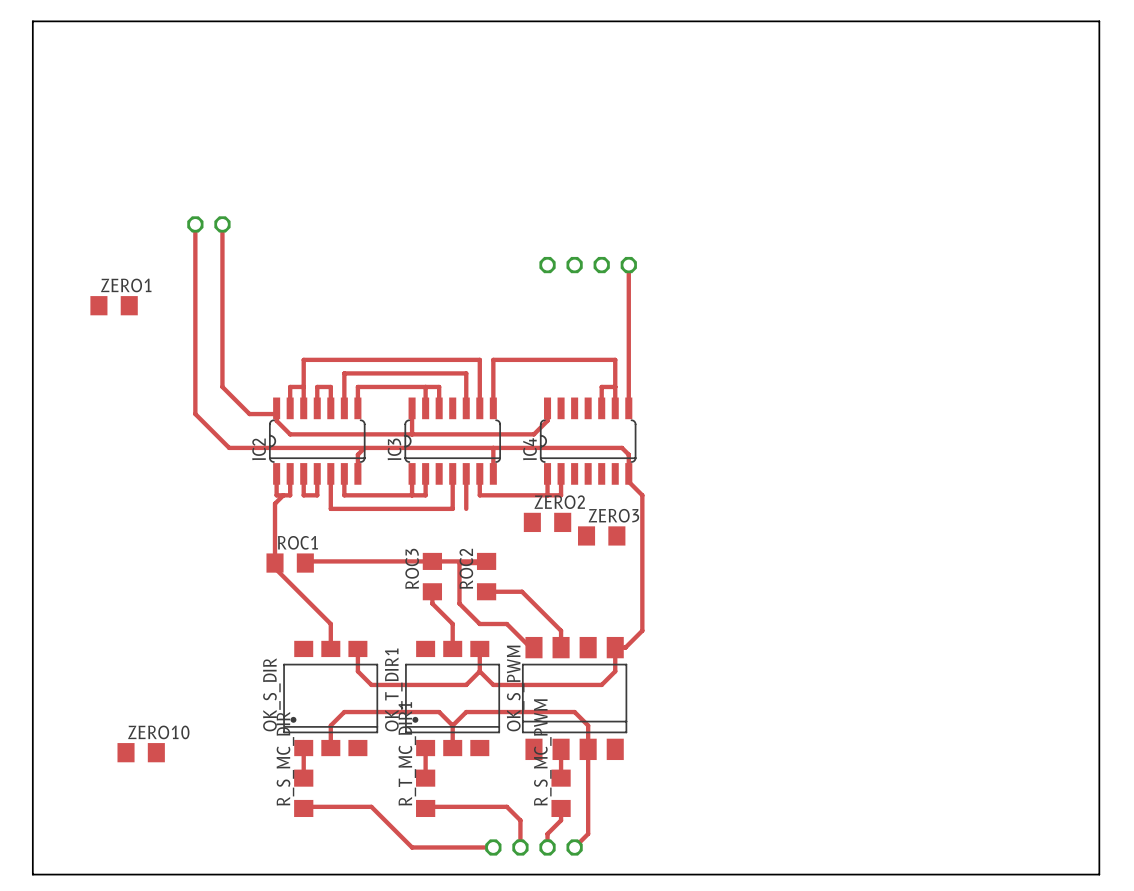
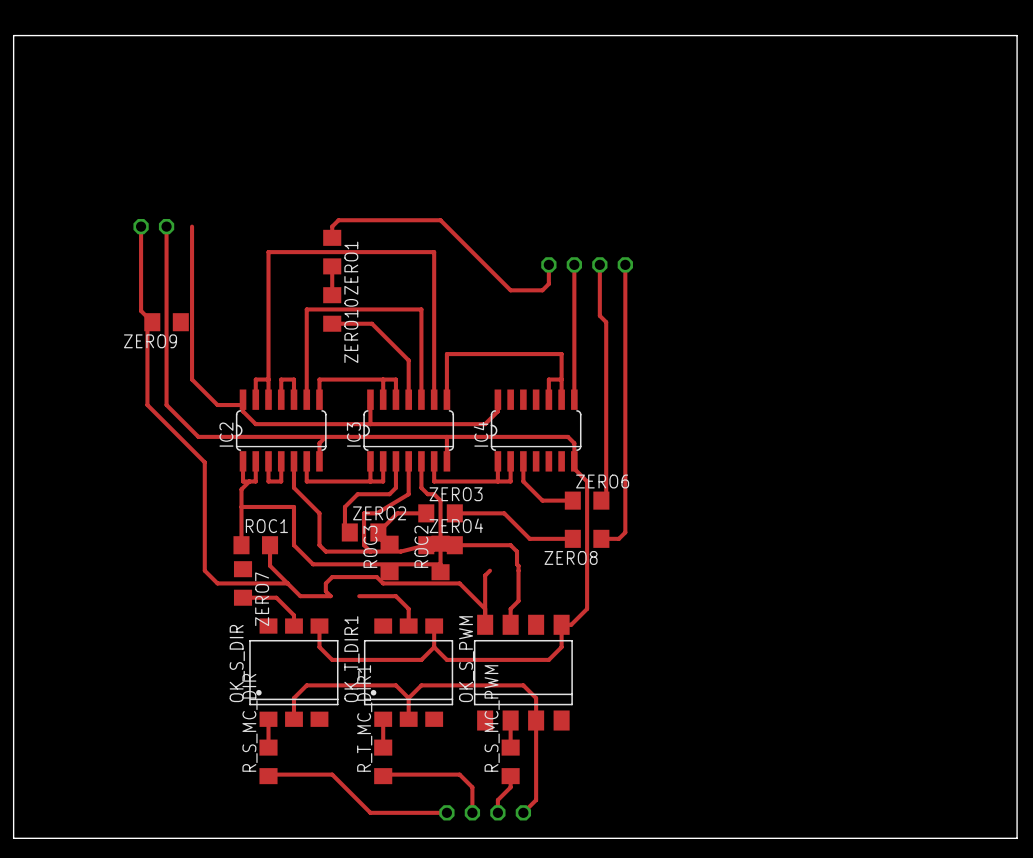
top track: none -> (141, 226) (141, 310) (152, 322) (147, 327) (147, 405) (204, 462) (204, 570) (217, 583) (287, 583)
part position: (222, 224) -> (141, 226)
top track: none -> (332, 237) (332, 226) (338, 220) (440, 220) (510, 290) (542, 290) (548, 283) (548, 264)
part: (547, 265) -> none
part: (574, 265) -> none
top track: none -> (599, 264) (599, 315) (606, 322) (606, 495) (601, 500)
part: none -> (599, 264)
top track: none -> (625, 264) (625, 532) (618, 538) (601, 538)
part: none -> (625, 264)
top track: none -> (332, 266) (332, 295)
ZERO1 rotation: 0° (114, 305) -> 90° clockwise (332, 252)
ZERO1 position: (114, 305) -> (332, 252)
ZERO9: none -> (166, 322)
top track: none -> (332, 323) (371, 323) (408, 360) (408, 399)
top track: (303, 359) (479, 359) -> (268, 354) (268, 252) (434, 252) (434, 354)
top track: (344, 373) (466, 373) -> (306, 366) (306, 309) (421, 309) (421, 366)
top track: none -> (523, 461) (523, 481) (542, 500) (572, 500)
top track: (330, 502) (330, 508) (398, 508) -> (349, 532) (344, 527) (344, 506) (357, 494)
top track: none -> (293, 487) (319, 513) (319, 545) (325, 551) (400, 551) (426, 545)
top track: (466, 502) (466, 508) -> (421, 487) (427, 494) (434, 494) (440, 500) (440, 564) (313, 564) (293, 545) (293, 506) (241, 506)
top track: (432, 508) (452, 508) -> (389, 494) (395, 487) (395, 461)
top track: none -> (408, 494) (376, 513) (364, 513) (364, 545) (370, 551)
ZERO6: none -> (587, 500)
ZERO2 position: (547, 522) -> (364, 532)
top track: none -> (426, 513) (397, 513) (378, 532)
top track: none -> (454, 513) (504, 513) (529, 538) (572, 538)
ZERO3 position: (601, 535) -> (440, 513)
ZERO8: none -> (587, 538)
top track: (305, 563) (306, 561) (486, 561) (484, 563) (459, 563) (459, 603) (479, 623) (506, 623) (530, 647) (533, 647) -> (270, 545) (270, 565) (300, 596) (330, 596) (325, 591) (325, 583) (332, 577) (376, 577) (383, 583) (459, 583) (485, 608)
ZERO4: none -> (440, 545)
top track: (275, 568) (330, 623) (330, 637) -> (243, 597) (276, 597) (293, 615)
top track: none -> (489, 570) (485, 575) (485, 624)
top track: (432, 591) (432, 603) (452, 623) (452, 630) -> (359, 596) (395, 596) (408, 608)
top track: (486, 591) (522, 591) (561, 630) -> (454, 545) (510, 545) (517, 551) (518, 601) (510, 608)
ZERO7: none -> (243, 583)
ZERO10 rotation: 0° (141, 752) -> 90° clockwise (332, 309)
ZERO10 position: (141, 752) -> (332, 309)

